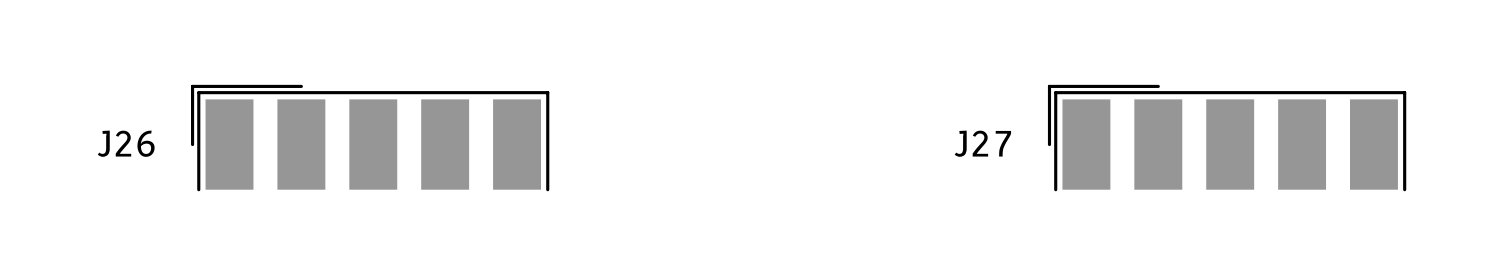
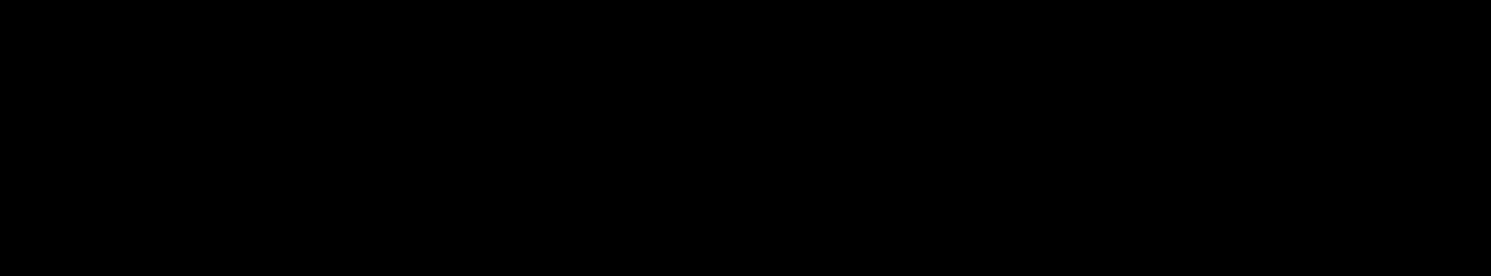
J26: (370, 138) -> none
J27: (1227, 138) -> none

